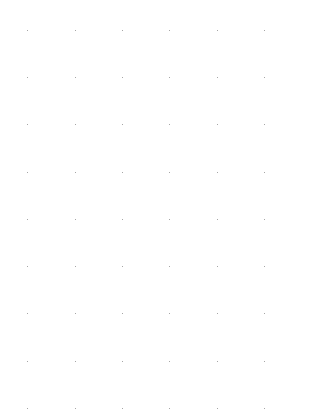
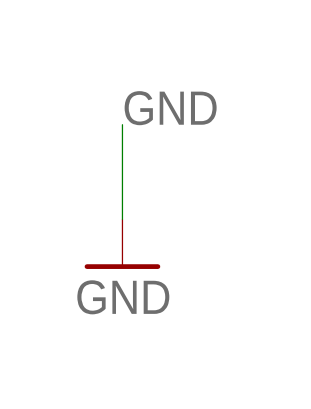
label: none -> GND (170, 108)
wire: none -> (122, 124) (122, 219)
power symbol: none -> GND (122, 244)

